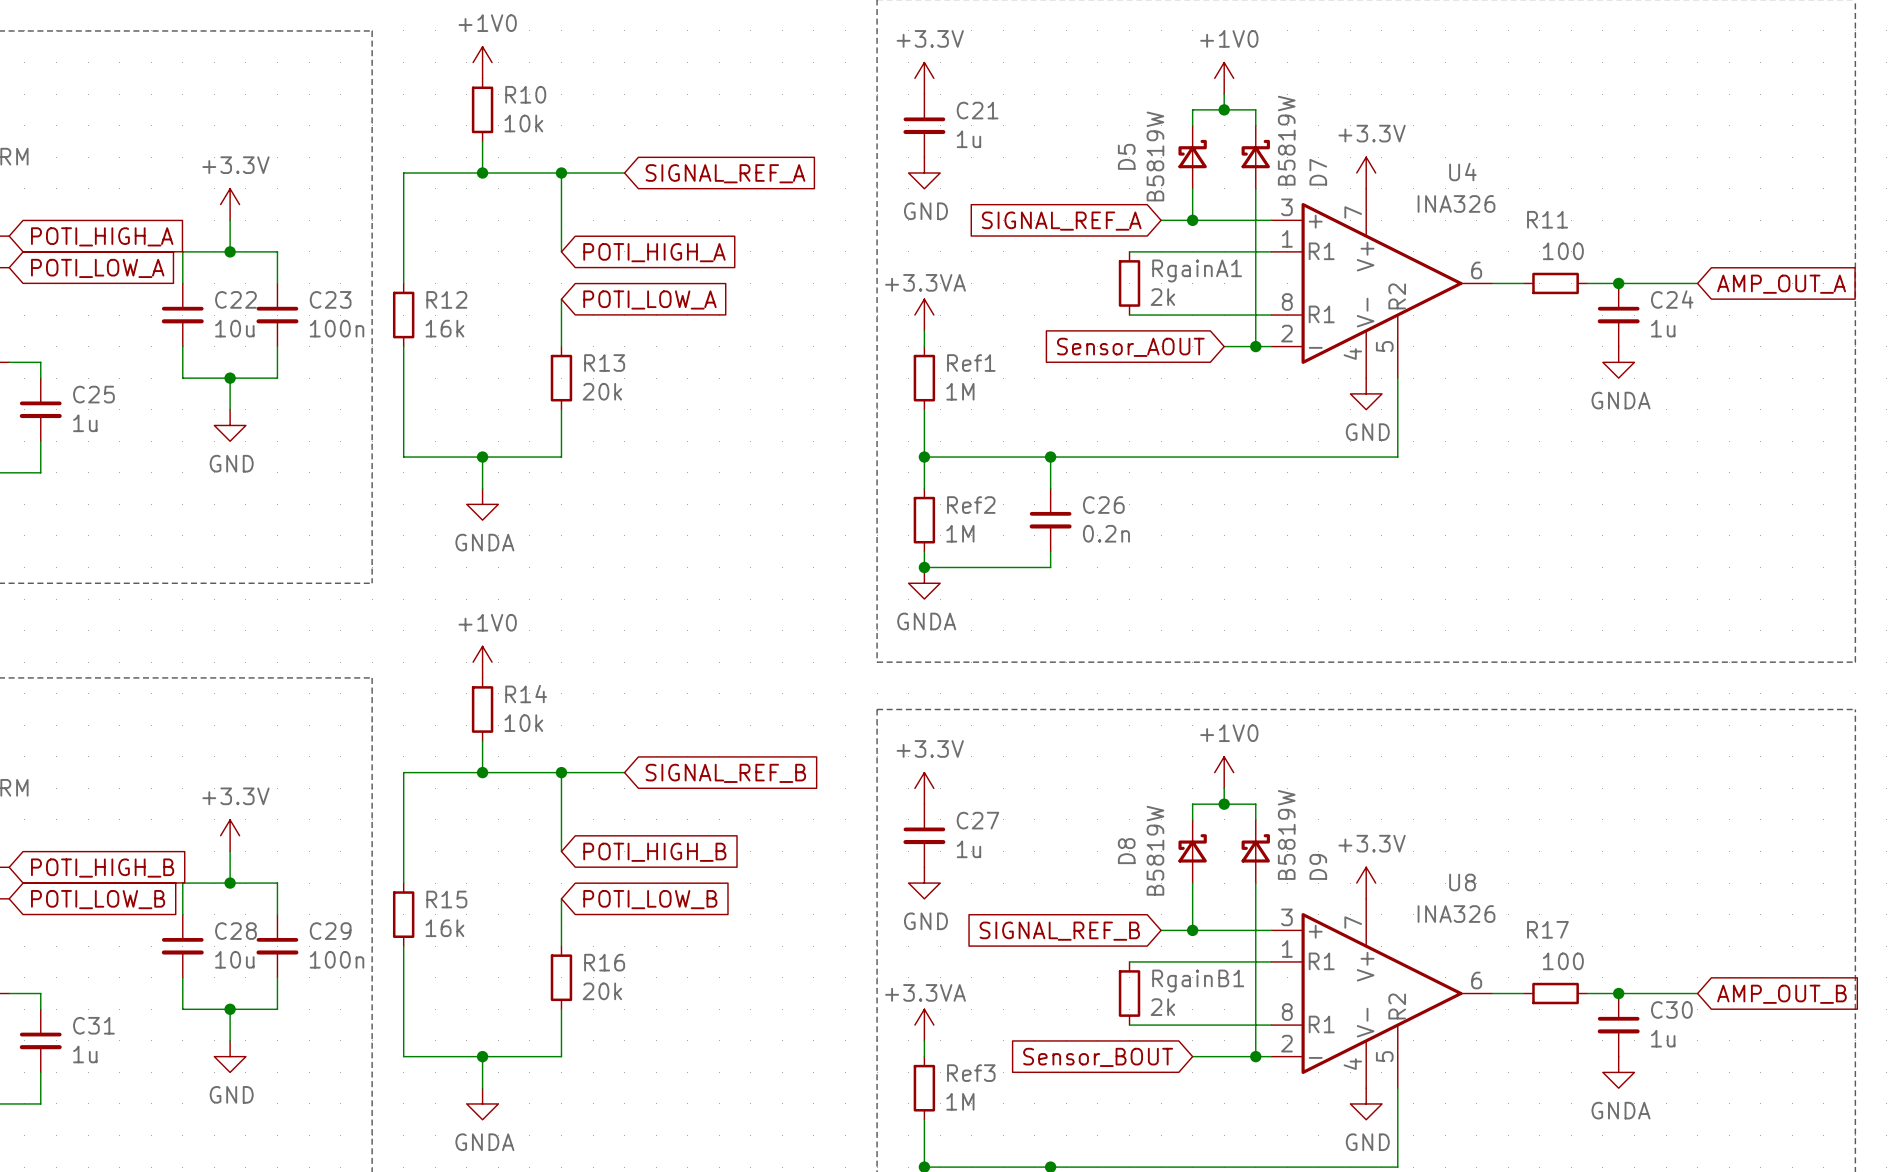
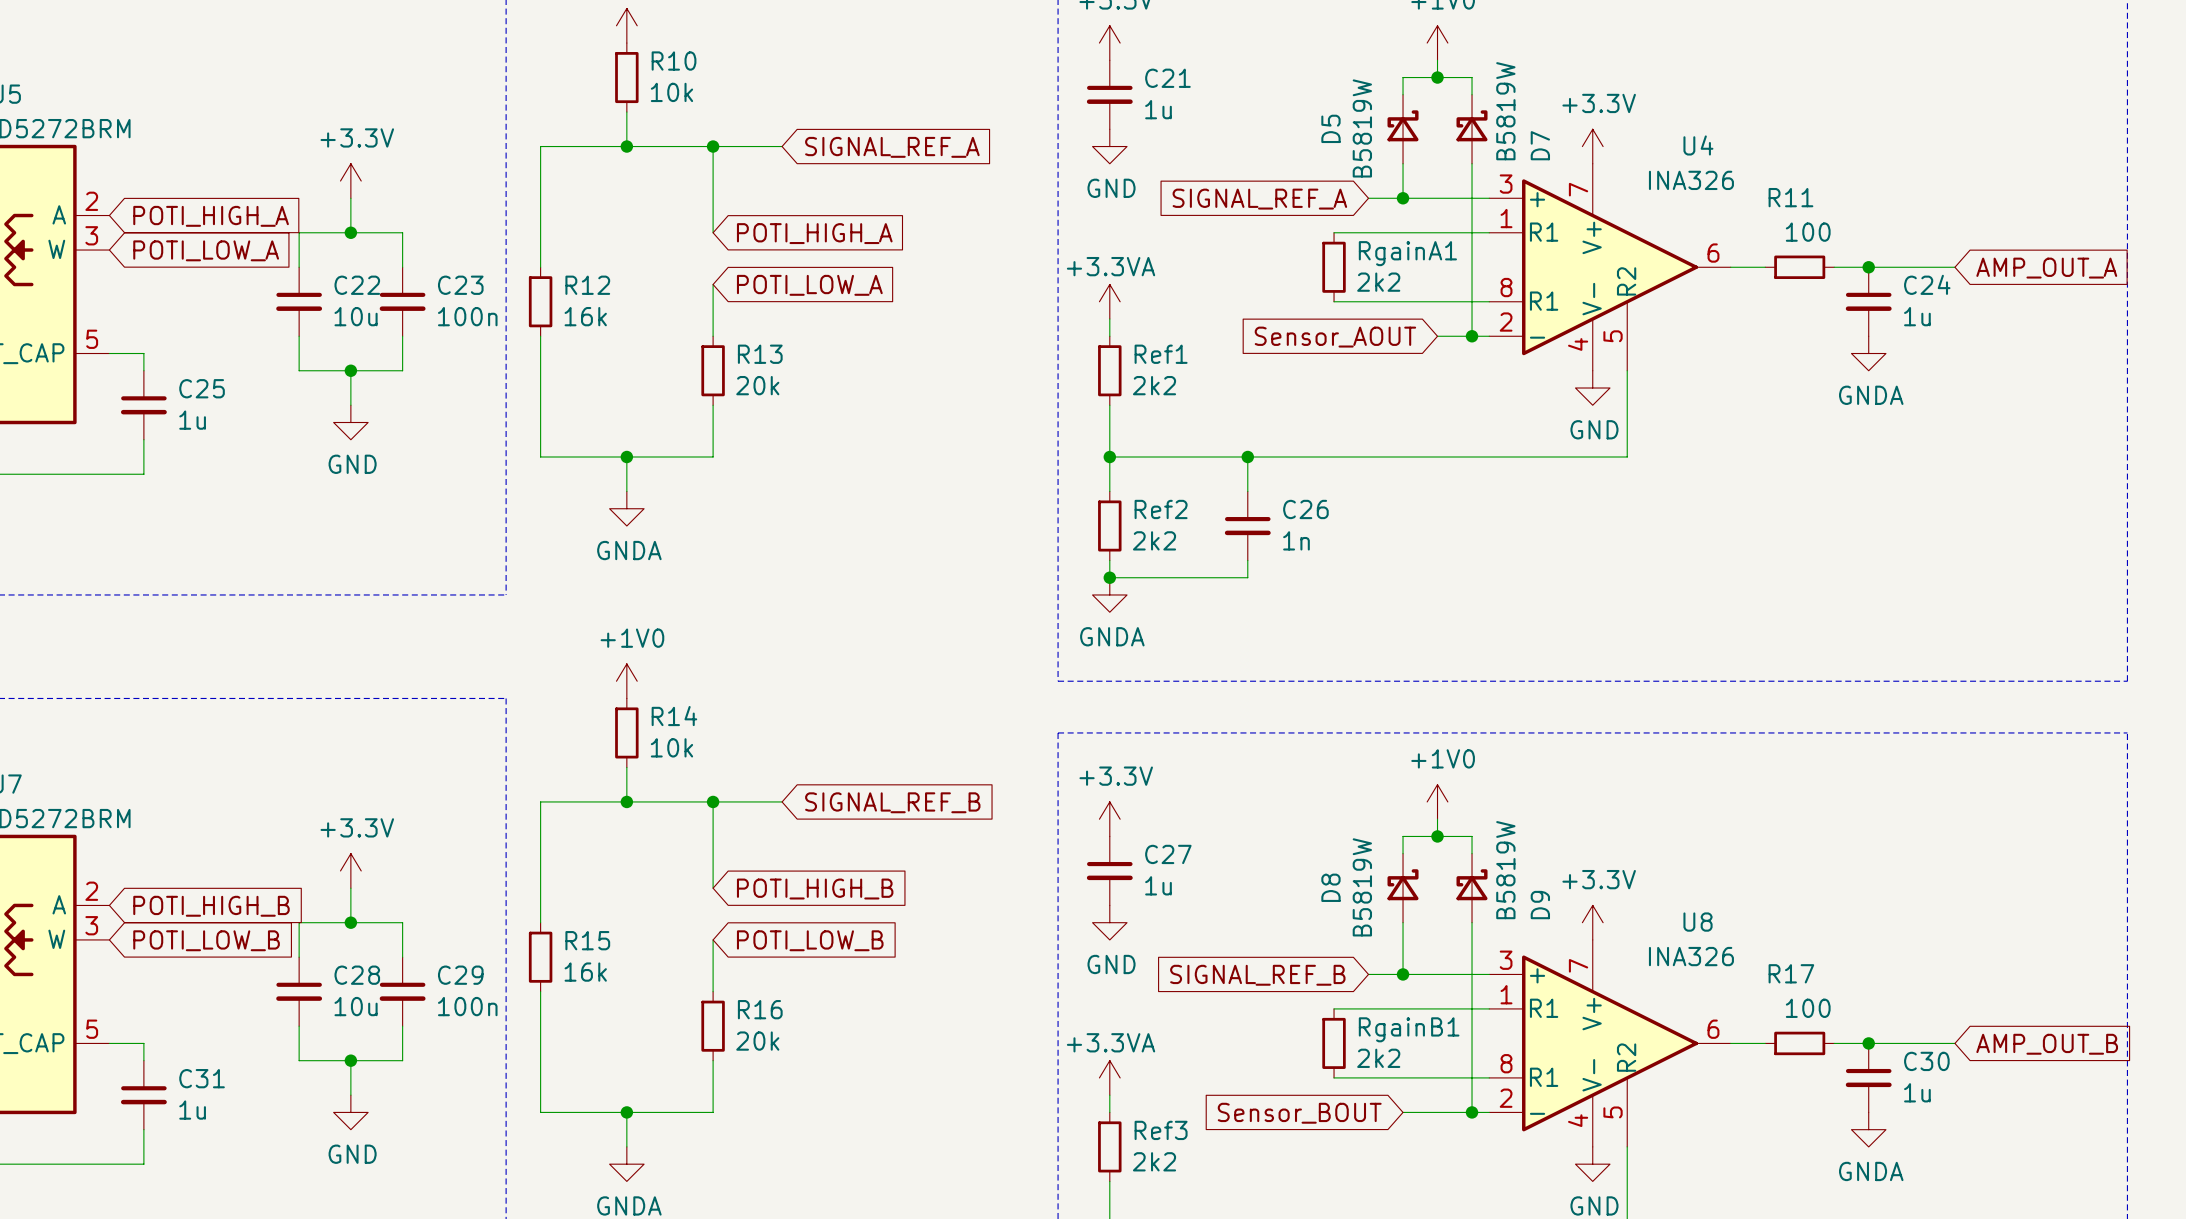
RgainA1 value: 2k (1162, 297) -> 2k2 (1378, 282)
Ref1 value: 1M (960, 391) -> 2k2 (1154, 385)
Ref2 value: 1M (960, 533) -> 2k2 (1154, 540)
C26 value: 0.2n (1106, 533) -> 1n (1296, 540)
RgainB1 value: 2k (1162, 1007) -> 2k2 (1378, 1058)
Ref3 value: 1M (960, 1101) -> 2k2 (1154, 1161)

